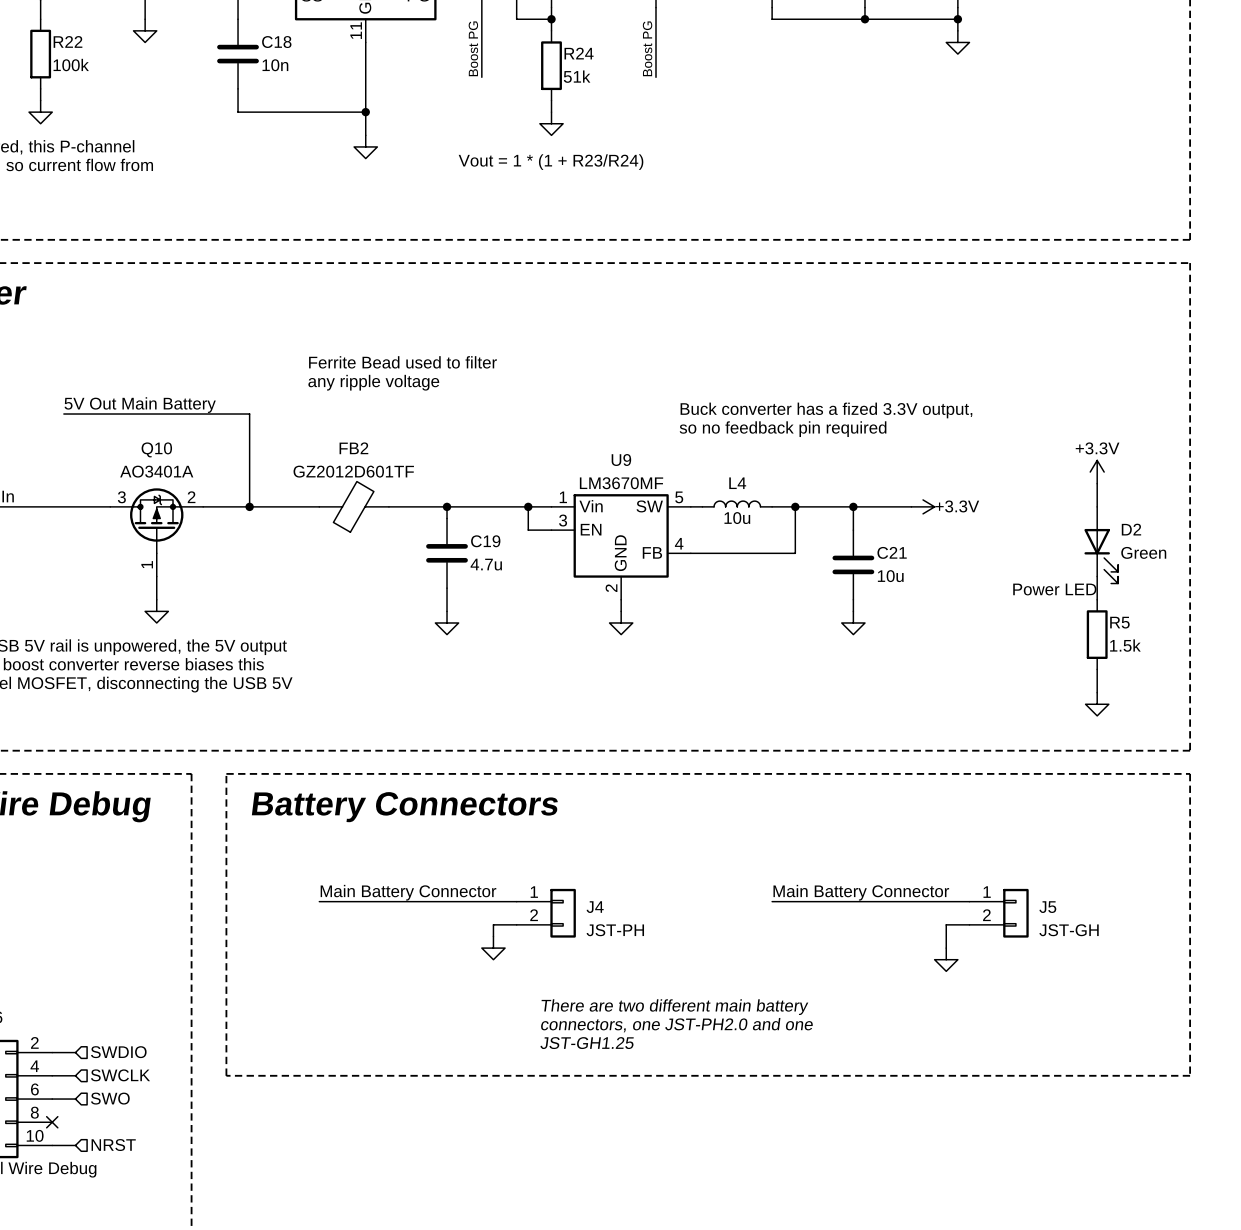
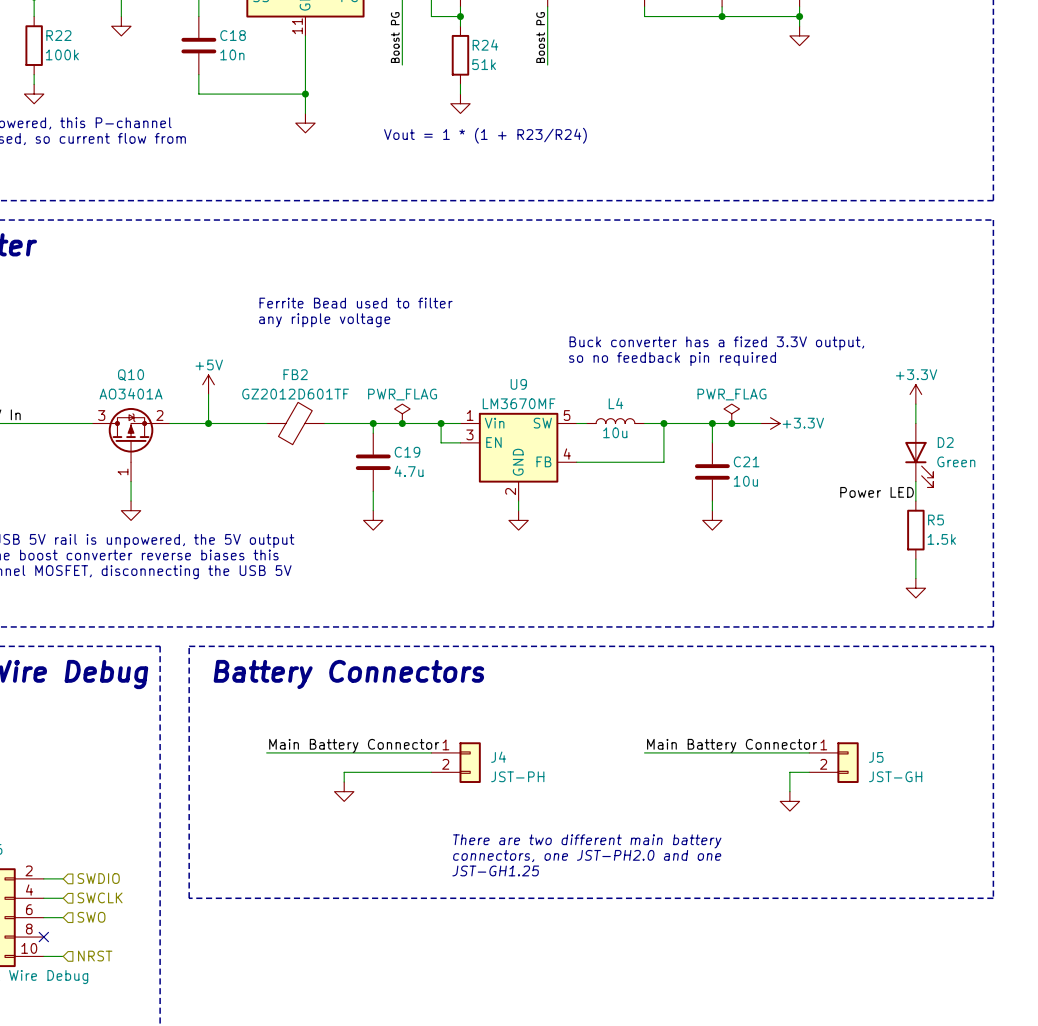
label: 5V Out Main Battery (140, 405) -> none
wire: (63, 414) (249, 414) (249, 472) -> none
power symbol: none -> +5V (208, 384)
power symbol: none -> PWR_FLAG (402, 413)
power symbol: none -> PWR_FLAG (731, 413)
junction: none -> (402, 423)
junction: none -> (731, 423)
wire: (493, 924) (493, 936) -> (412, 772) (344, 772) (344, 782)
power symbol position: (493, 948) -> (344, 791)

